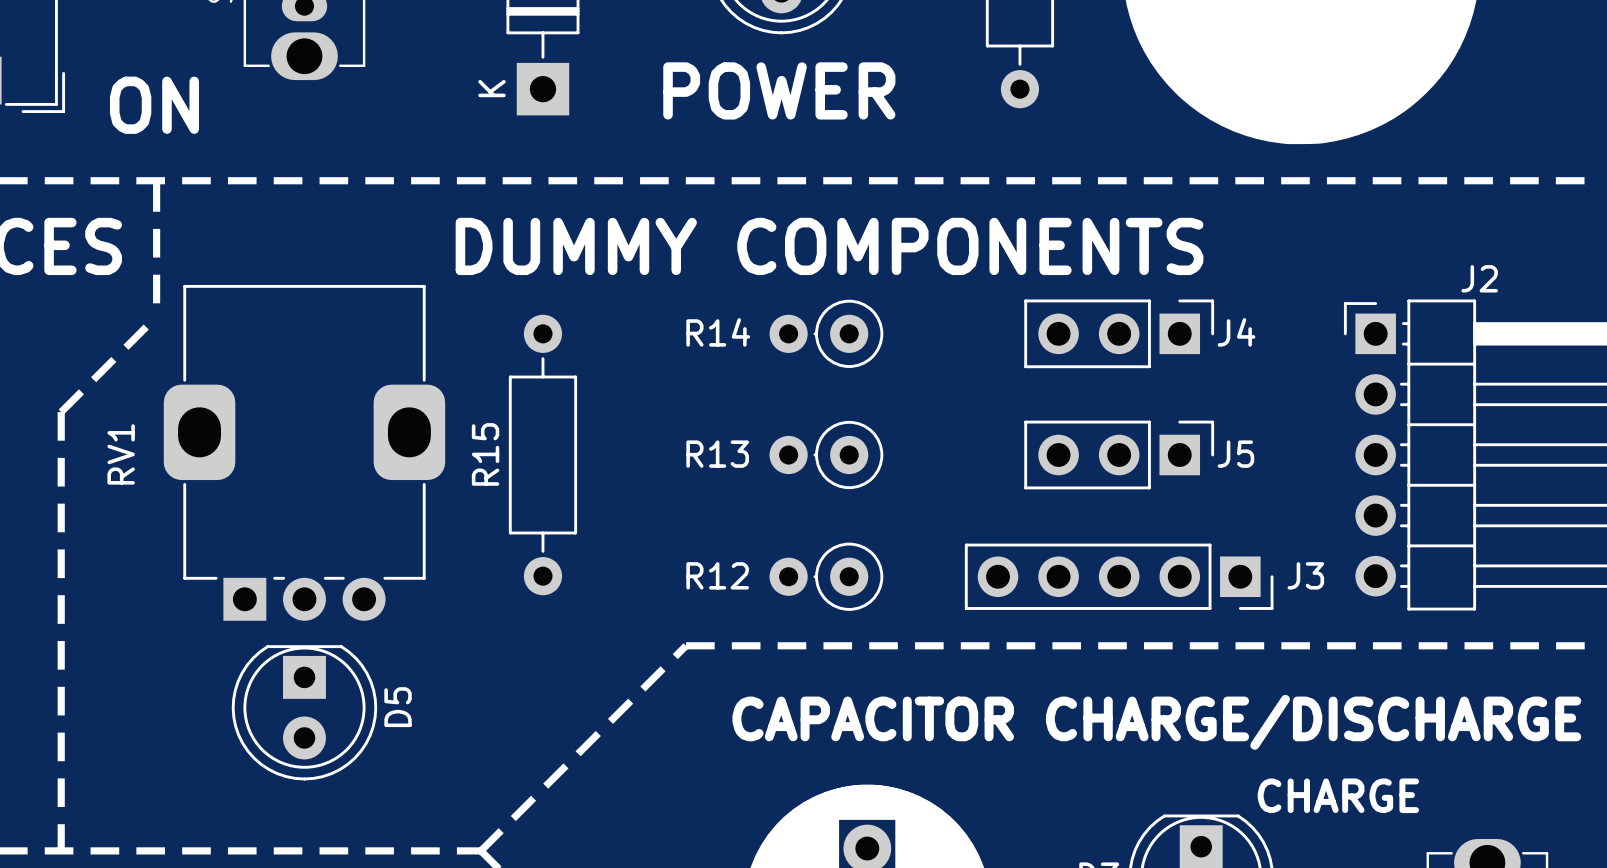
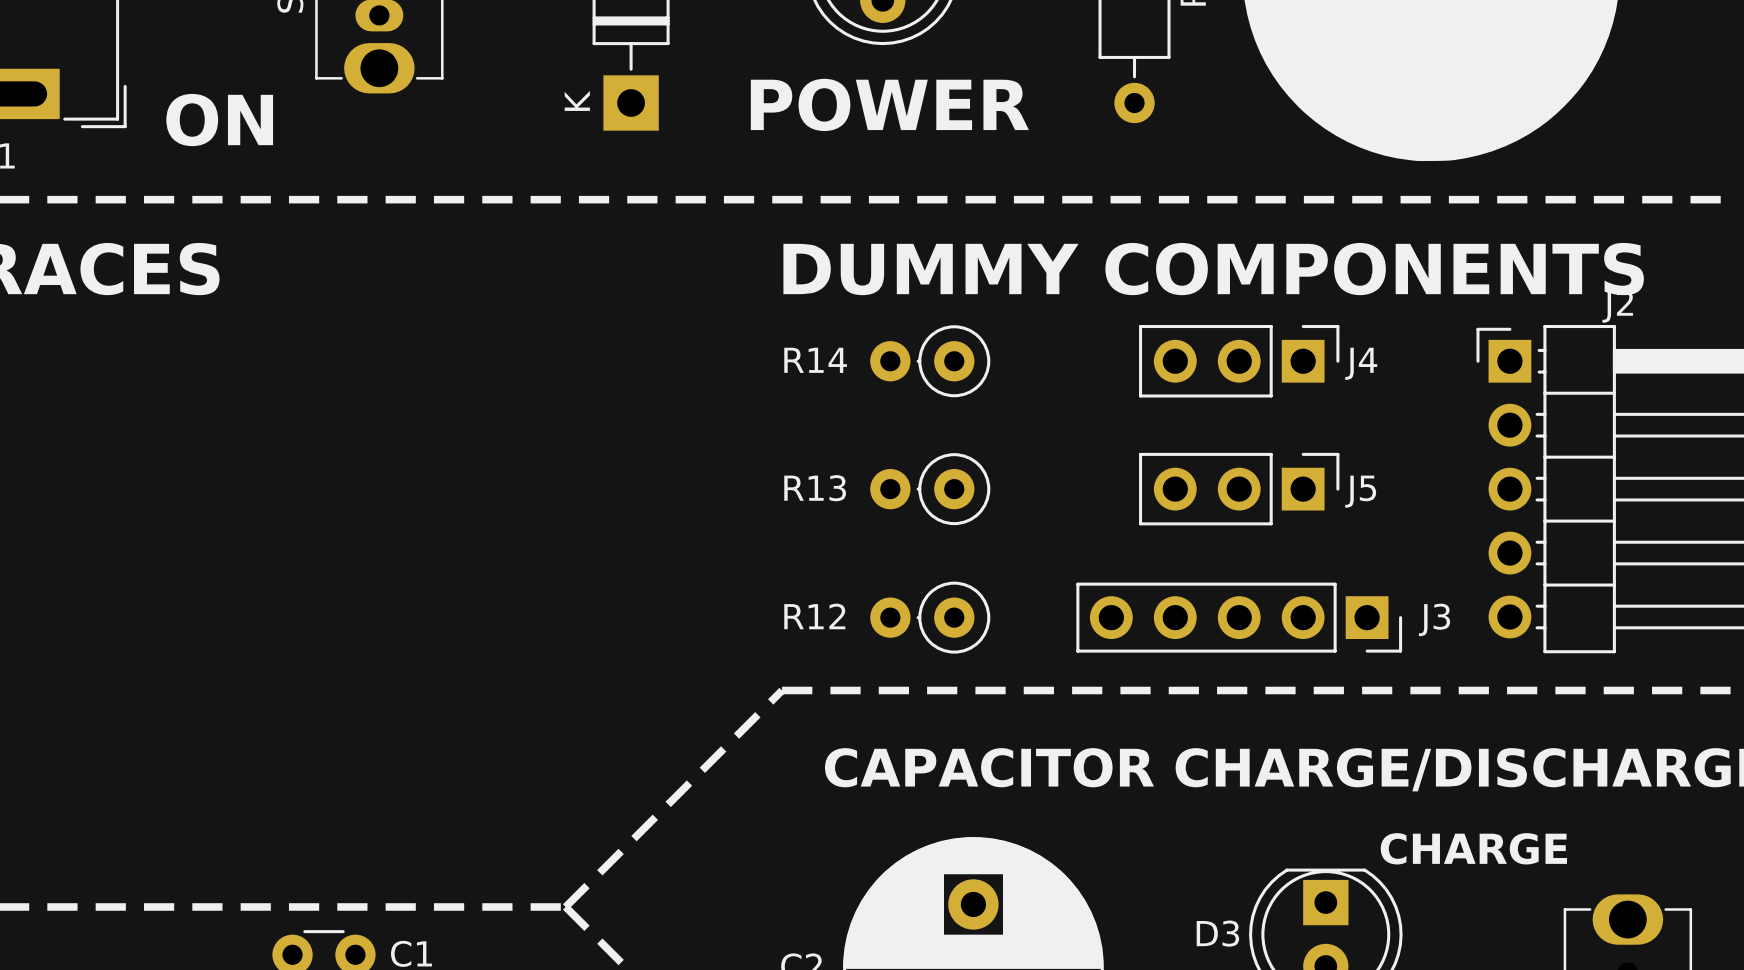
line: (156, 183) (156, 316) (61, 412) (61, 850) -> none
text position: DUMMY COMPONENTS (829, 246) -> DUMMY COMPONENTS (1213, 269)
RV1: (304, 452) -> none
R15: (542, 455) -> none
D5: (304, 712) -> none

